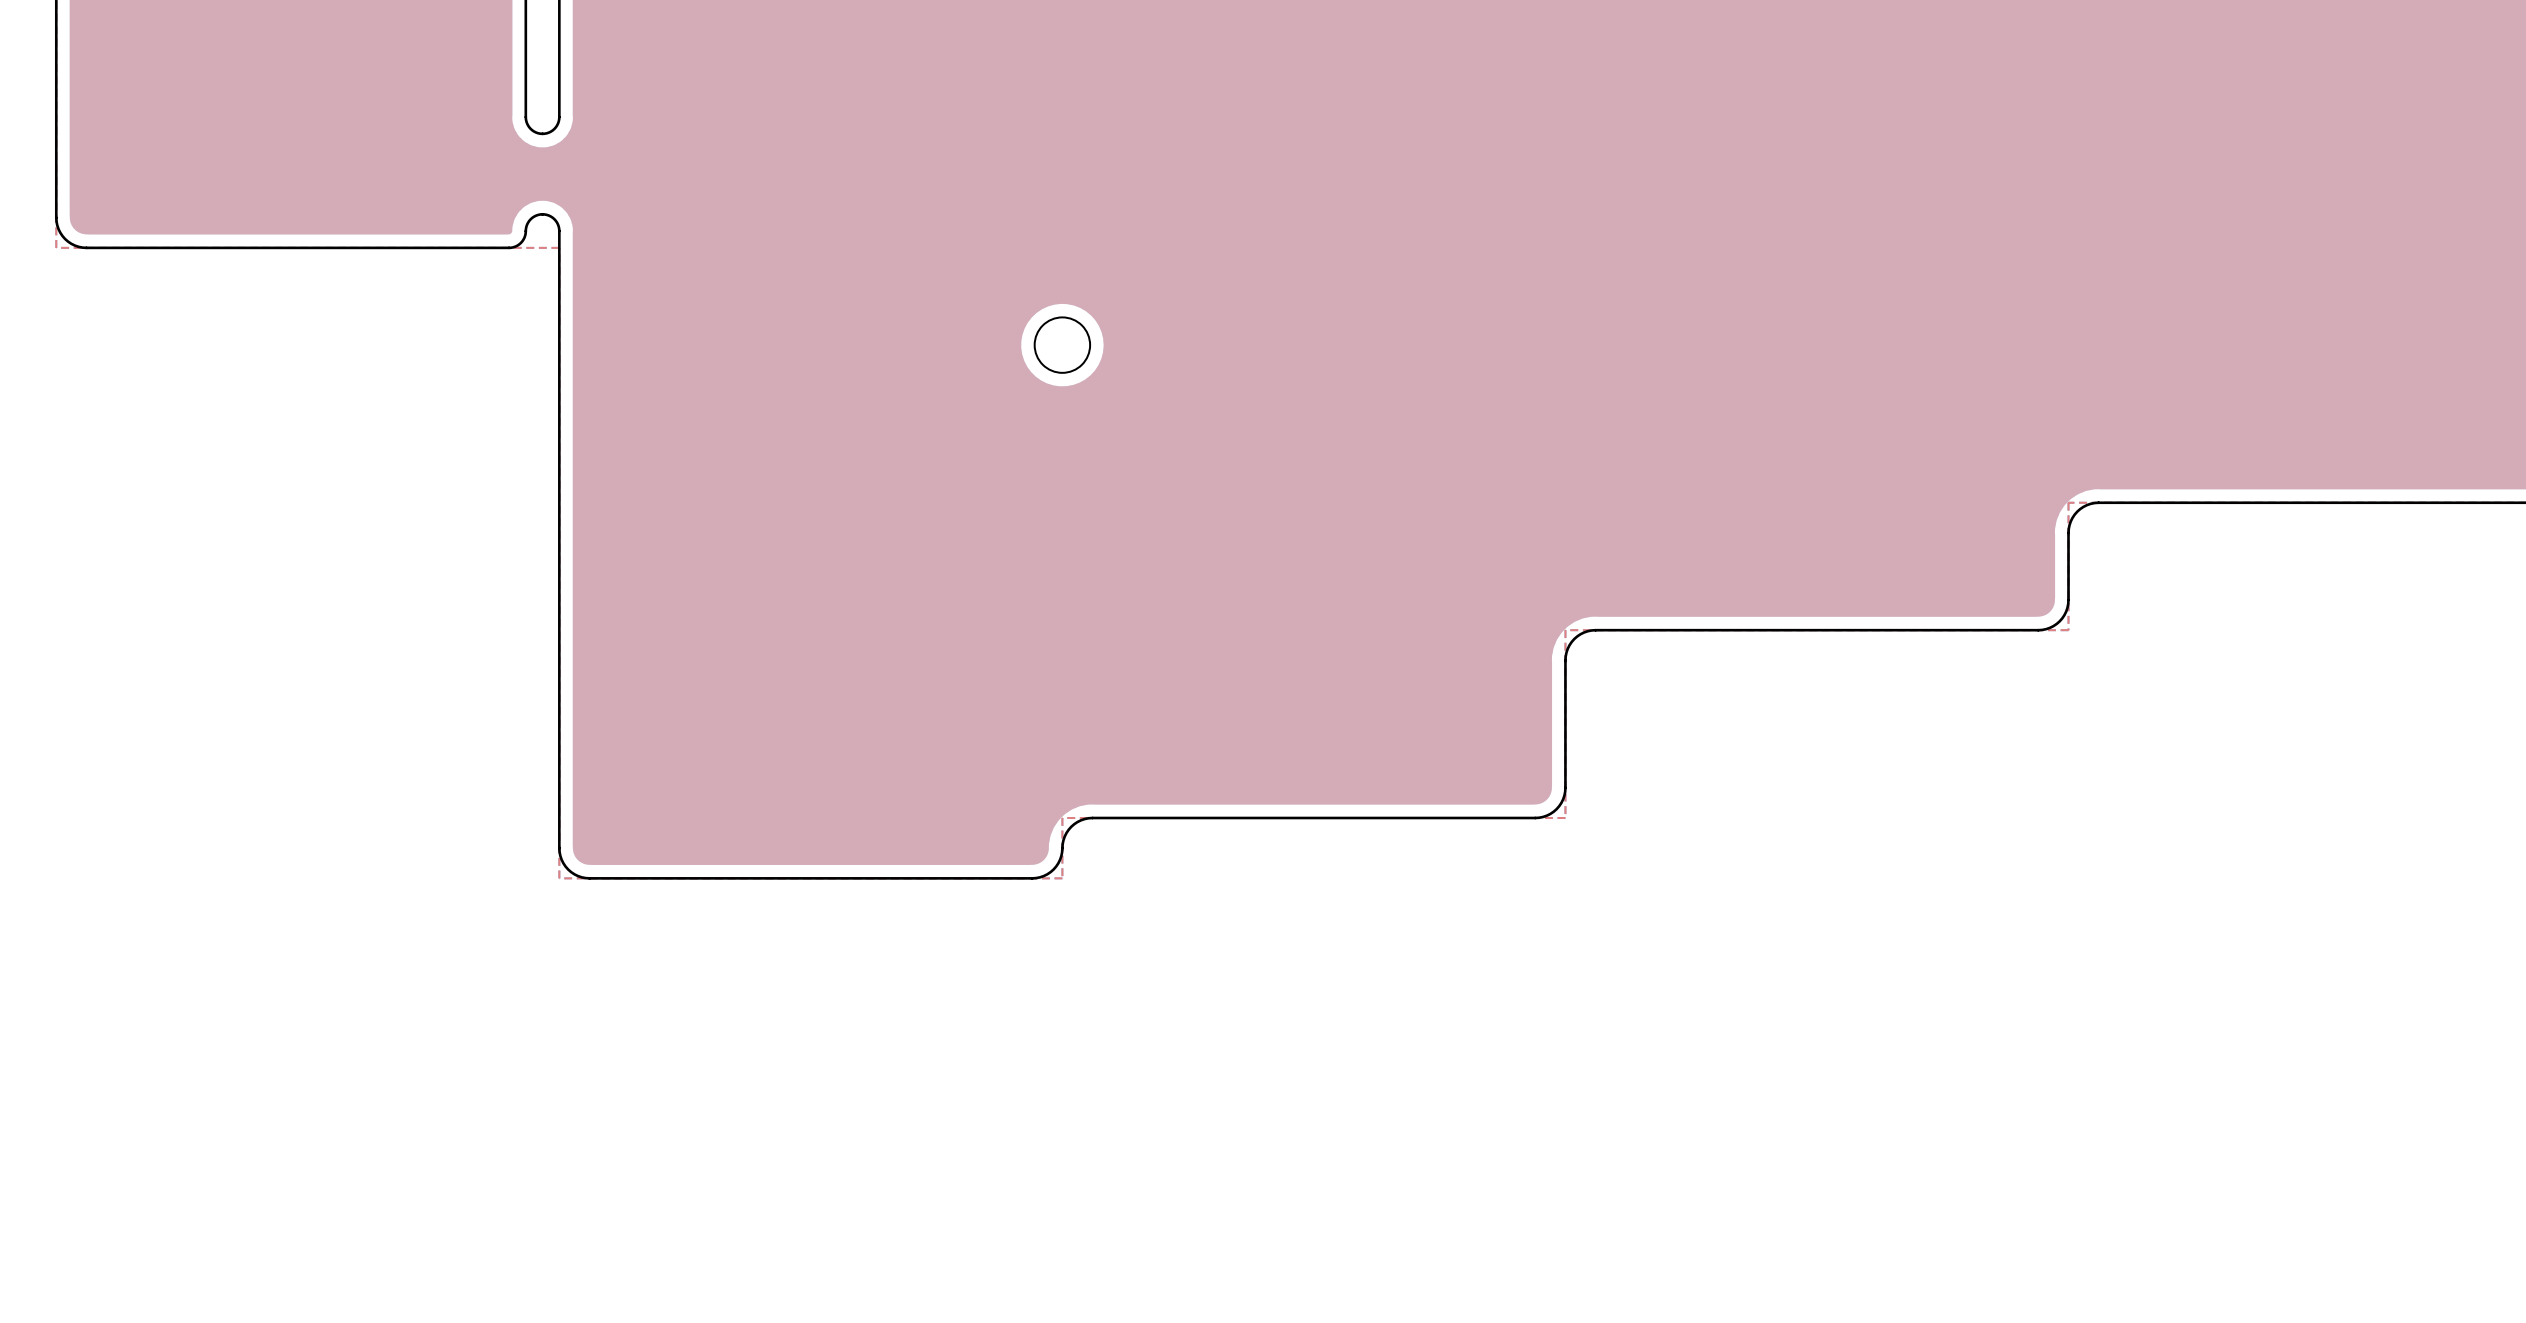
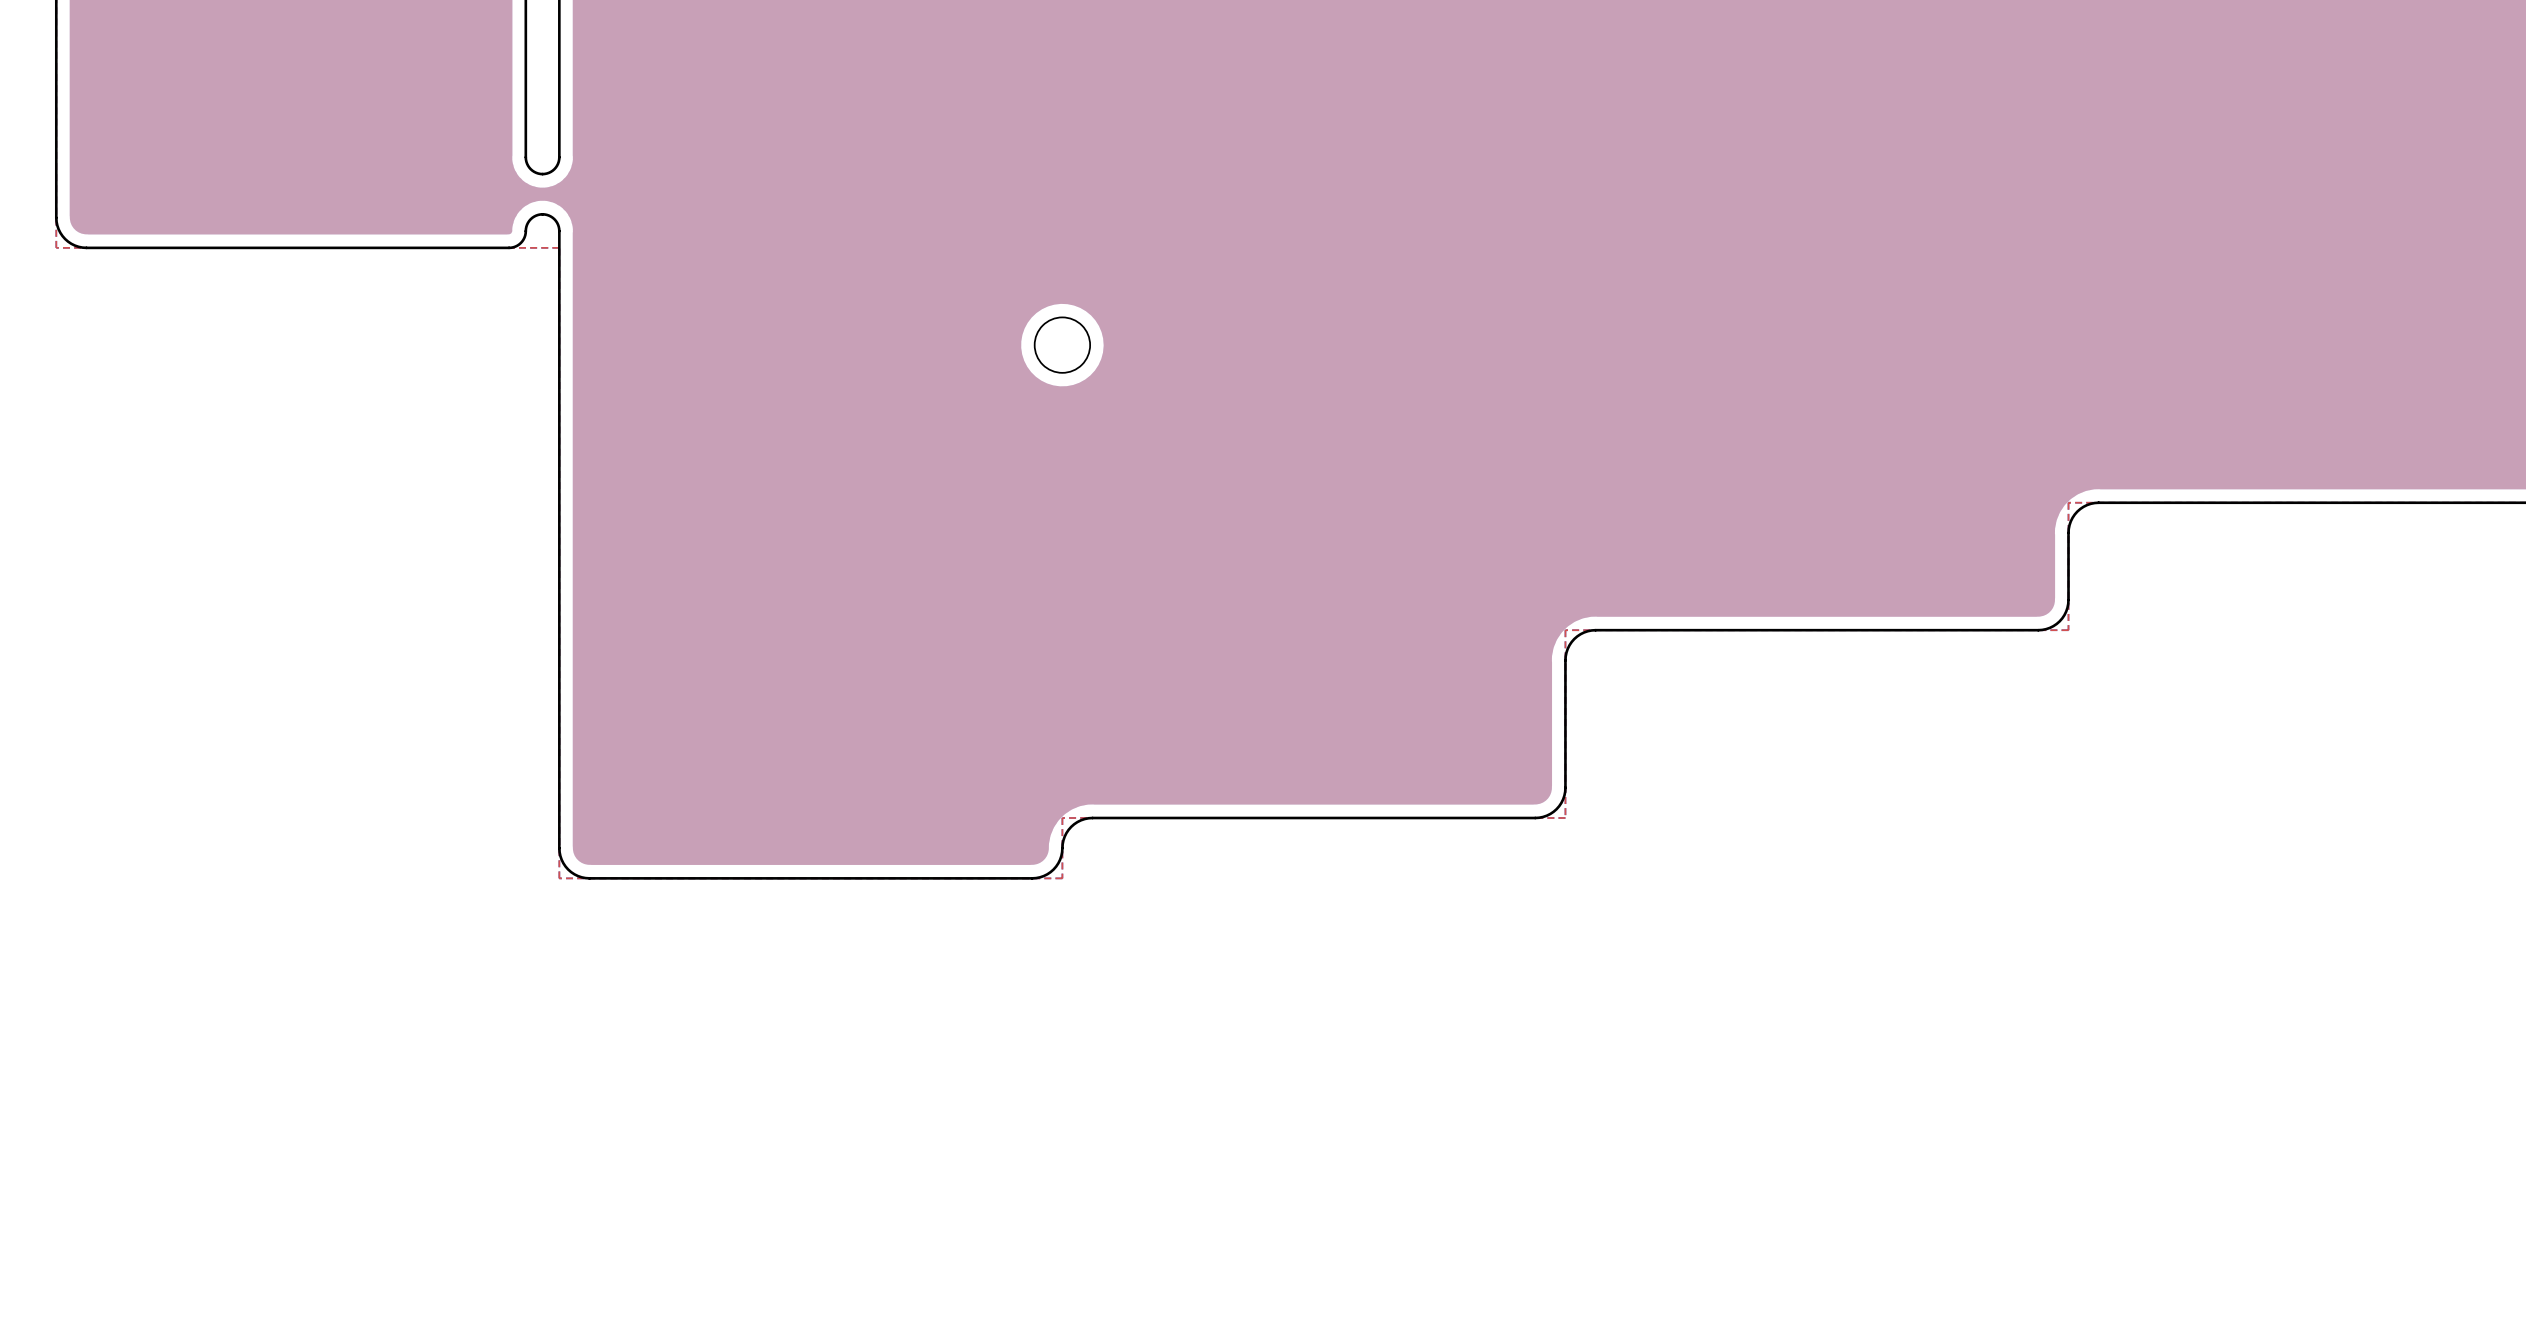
board edge: (525, 117) (530, 128) (542, 133) (554, 128) (559, 117) -> (525, 117) (526, 161) (532, 170) (542, 174) (552, 170) (558, 161) (559, 117)

